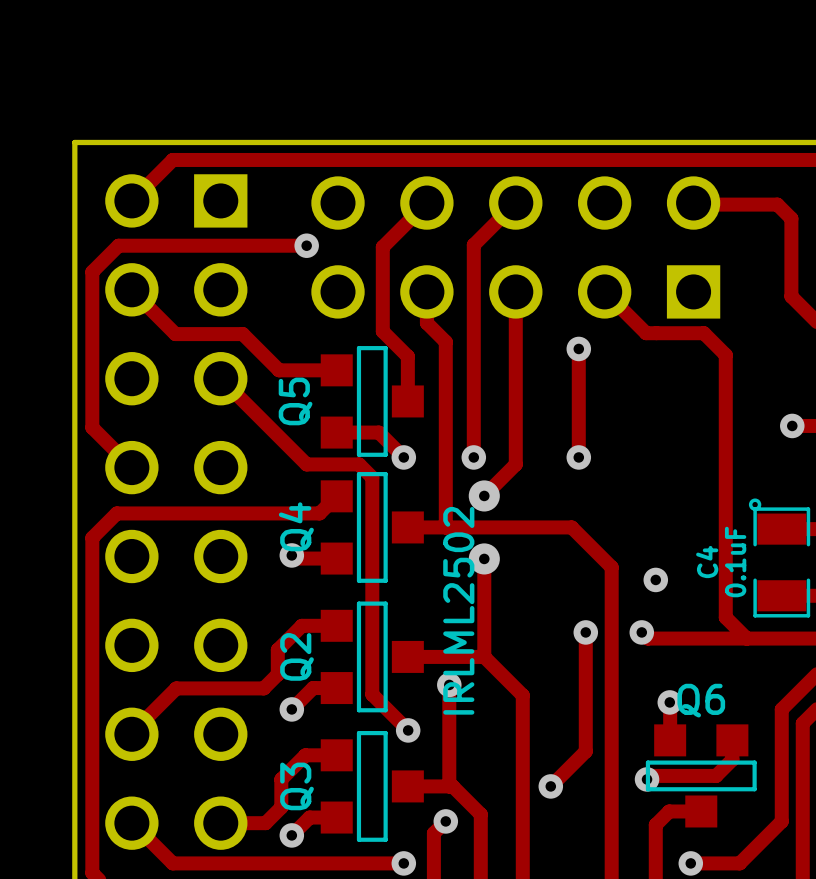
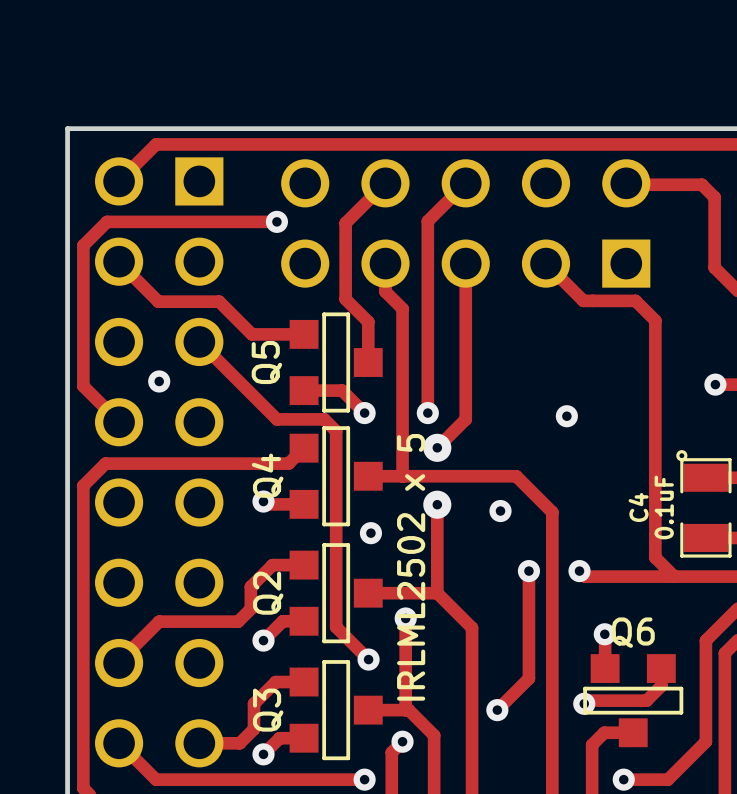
track: (578, 348) (578, 457) -> none
via: (578, 348) -> none
via: none -> (159, 381)
via position: (578, 457) -> (566, 416)
via: none -> (500, 511)
via: (655, 579) -> none
via: none -> (370, 533)
Q5 value: IRLML2502 (458, 610) -> IRLML2502 x 5 (411, 567)

